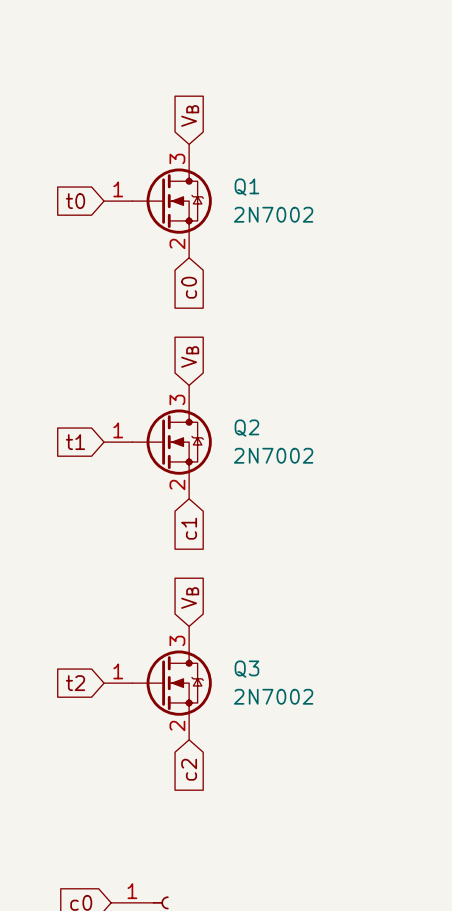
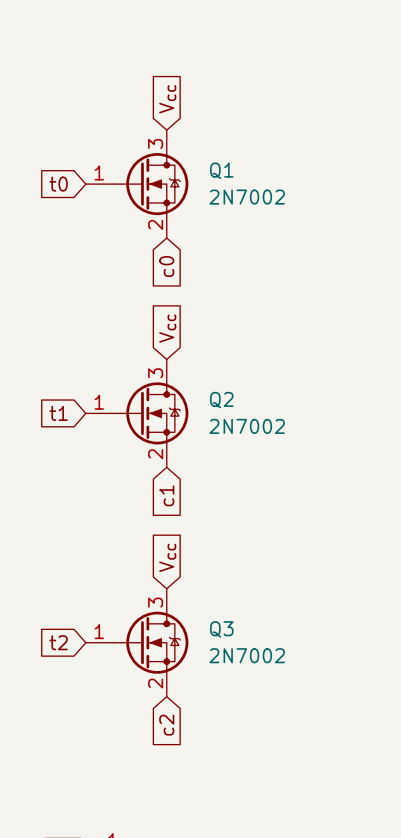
global label: VB (190, 115) -> Vcc (167, 99)
global label: VB (190, 356) -> Vcc (167, 328)
global label: VB (190, 598) -> Vcc (167, 557)

